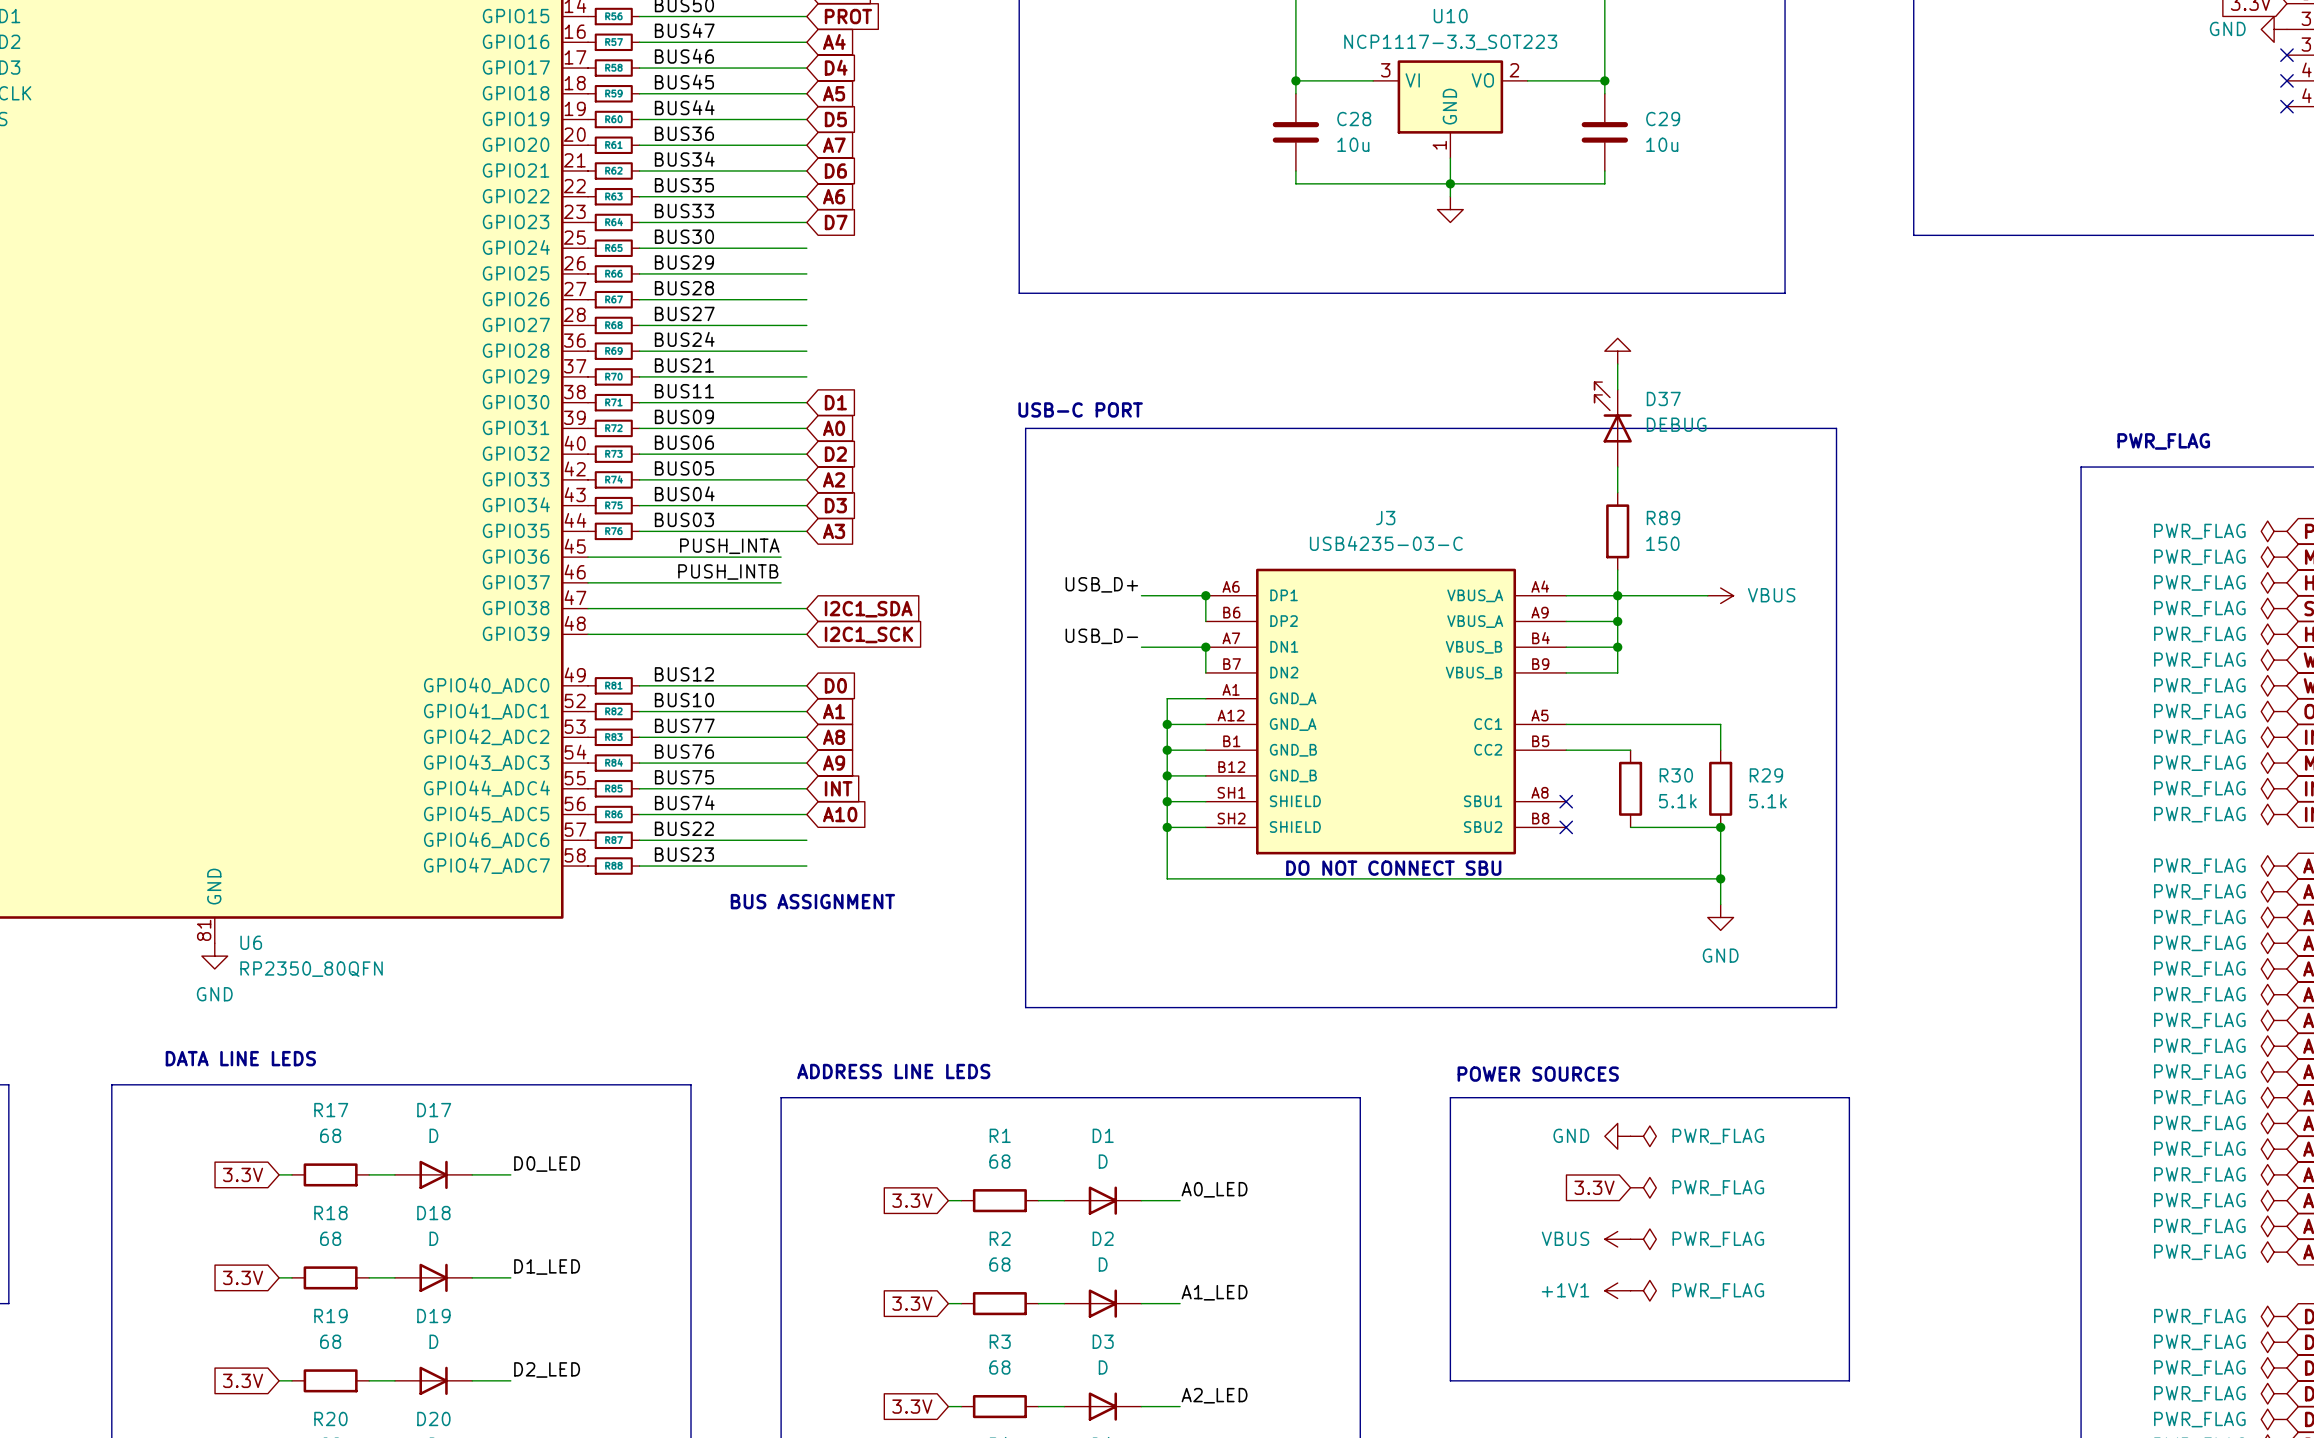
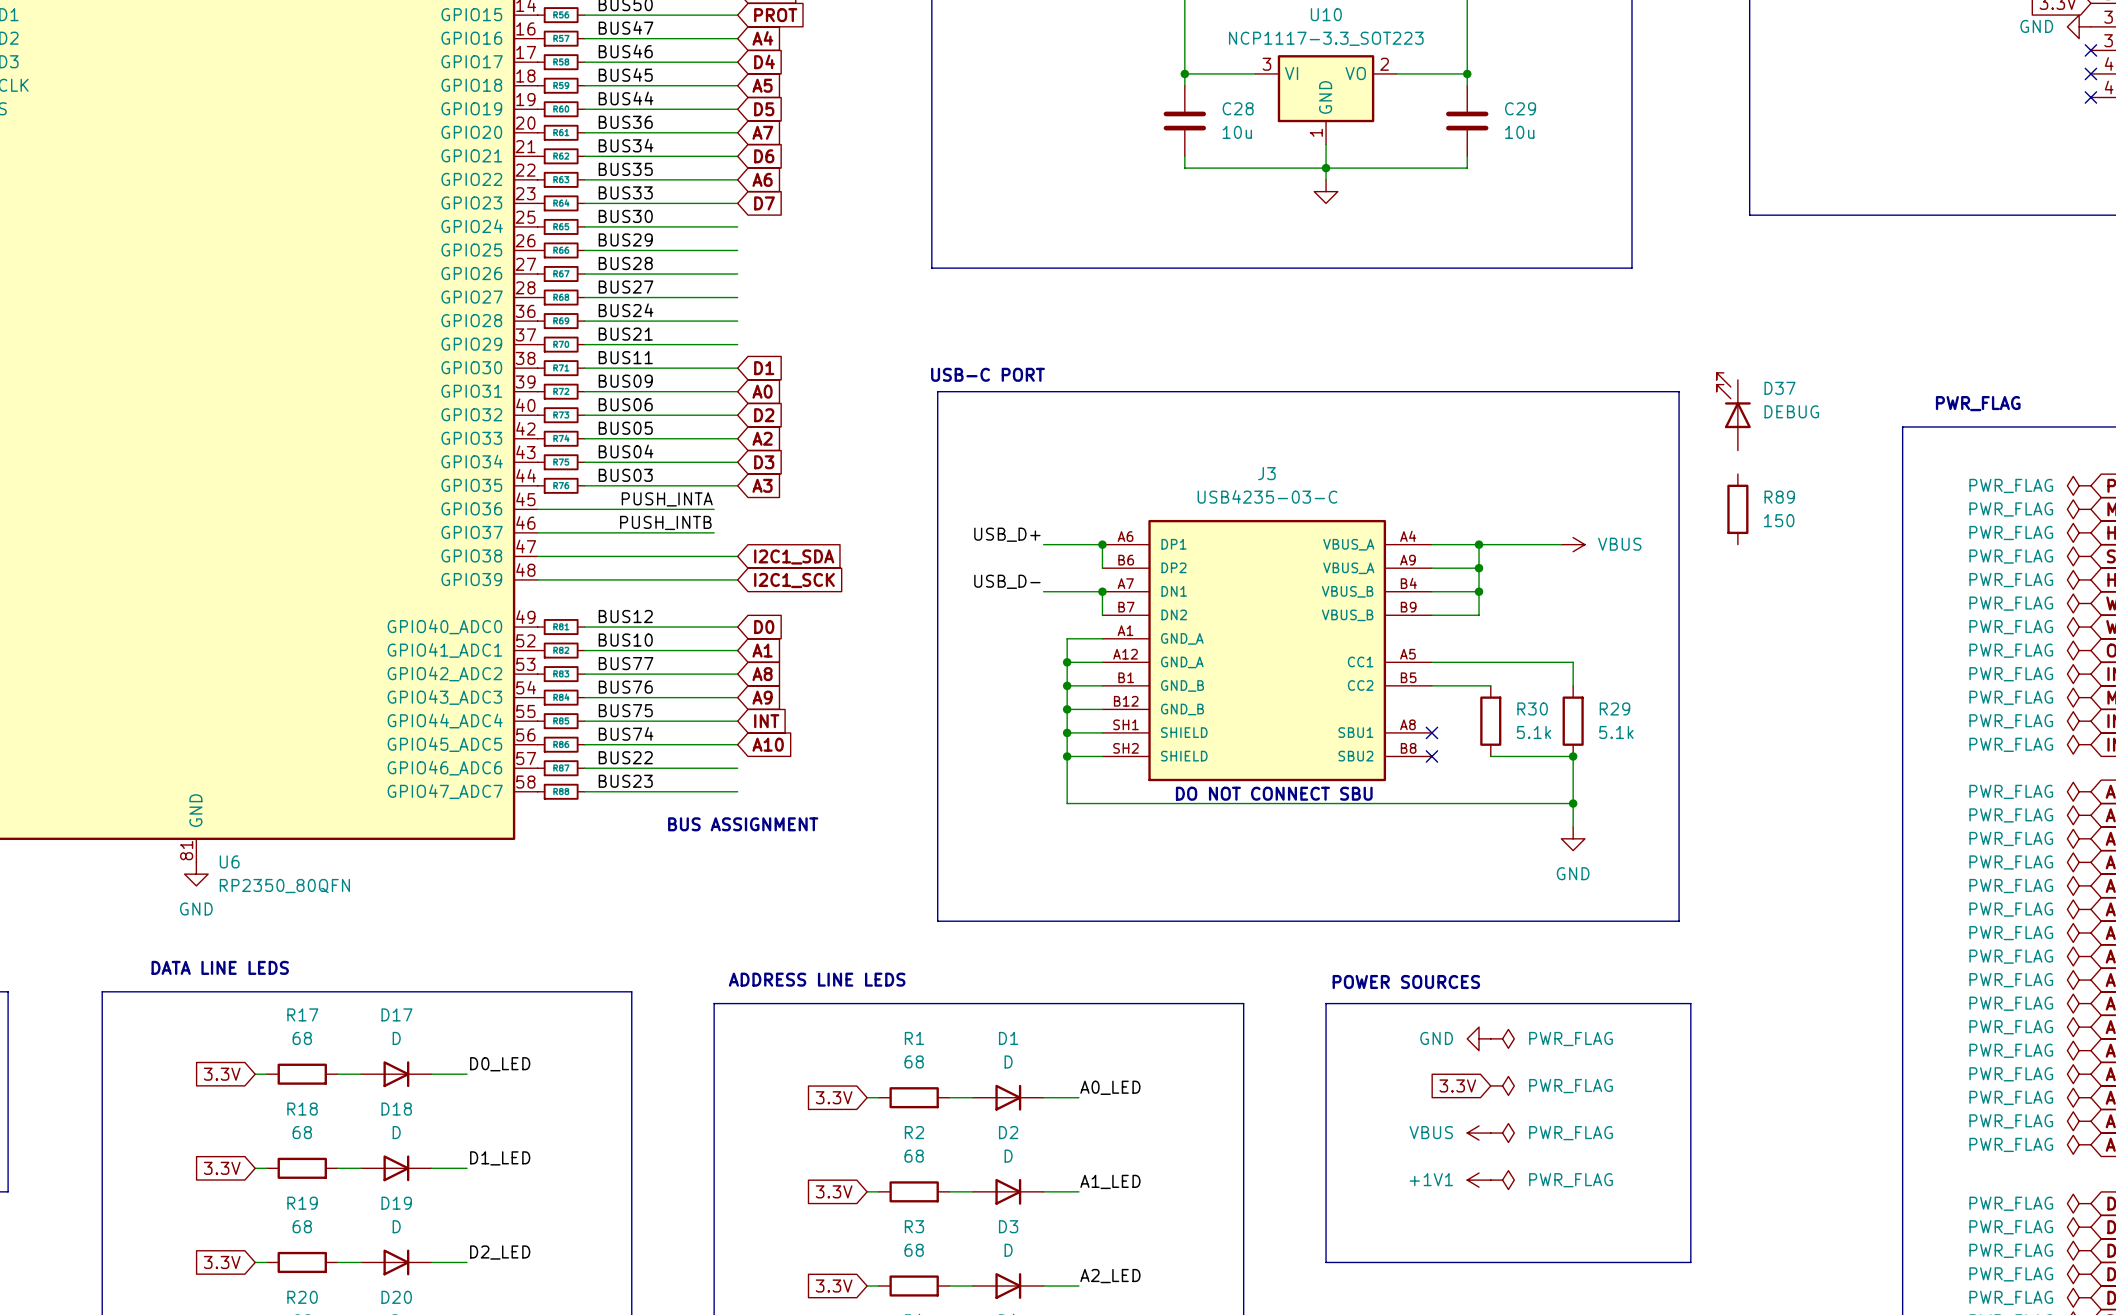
power symbol: (1617, 351) -> none
wire: (1617, 364) (1617, 389) -> none
D37 position: (1613, 424) -> (1733, 411)
wire: (1617, 467) (1617, 492) -> none
R89 position: (1617, 531) -> (1737, 509)
wire: (1617, 569) (1617, 595) -> none

